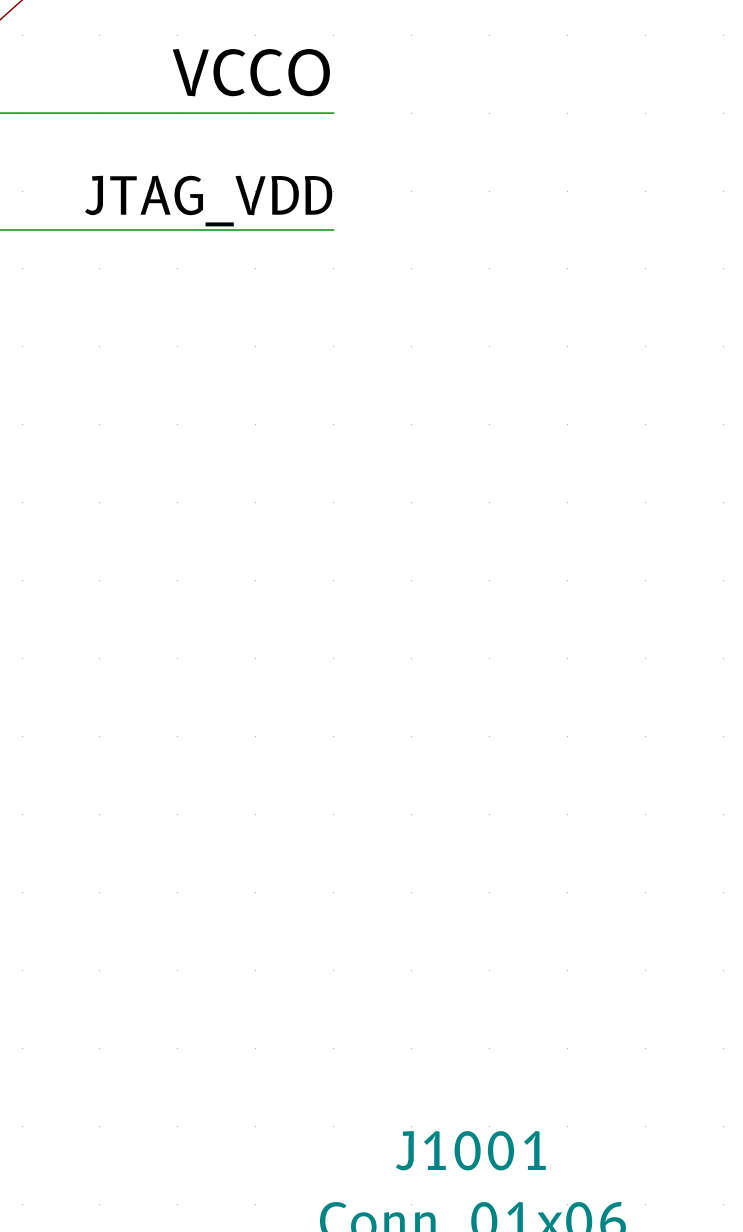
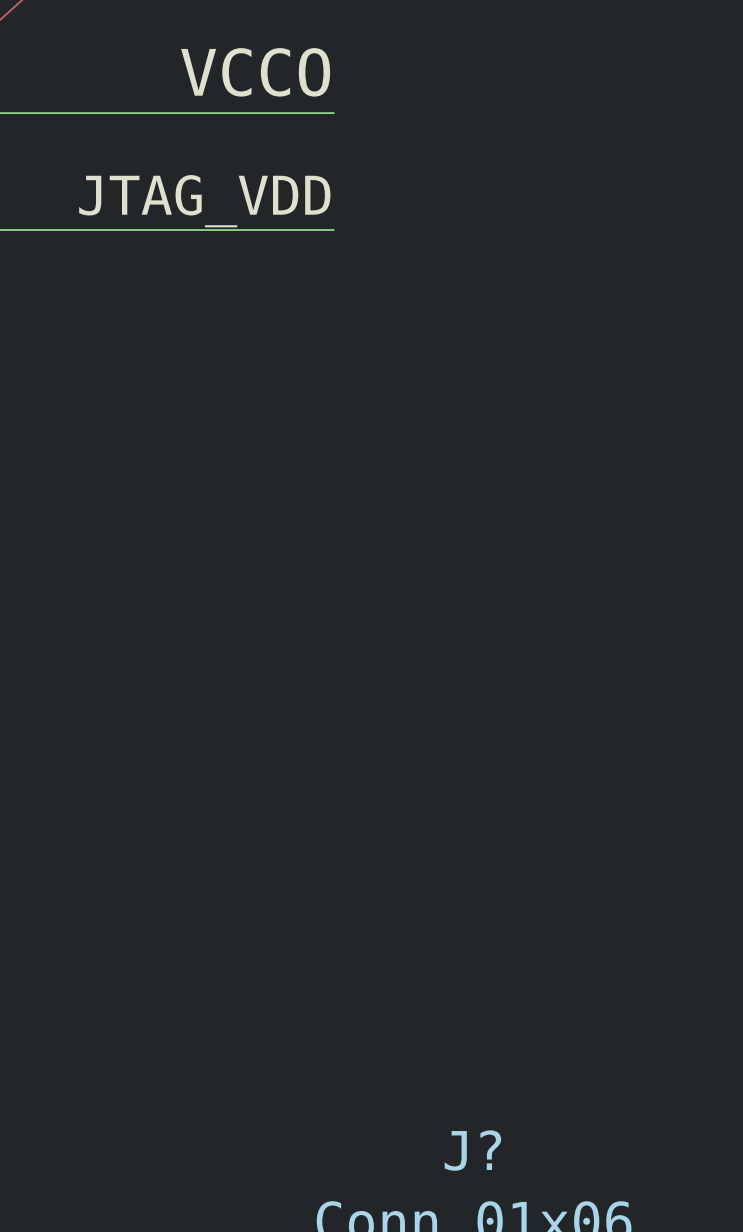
J1001 name: J1001 (470, 1150) -> J? (472, 1150)

